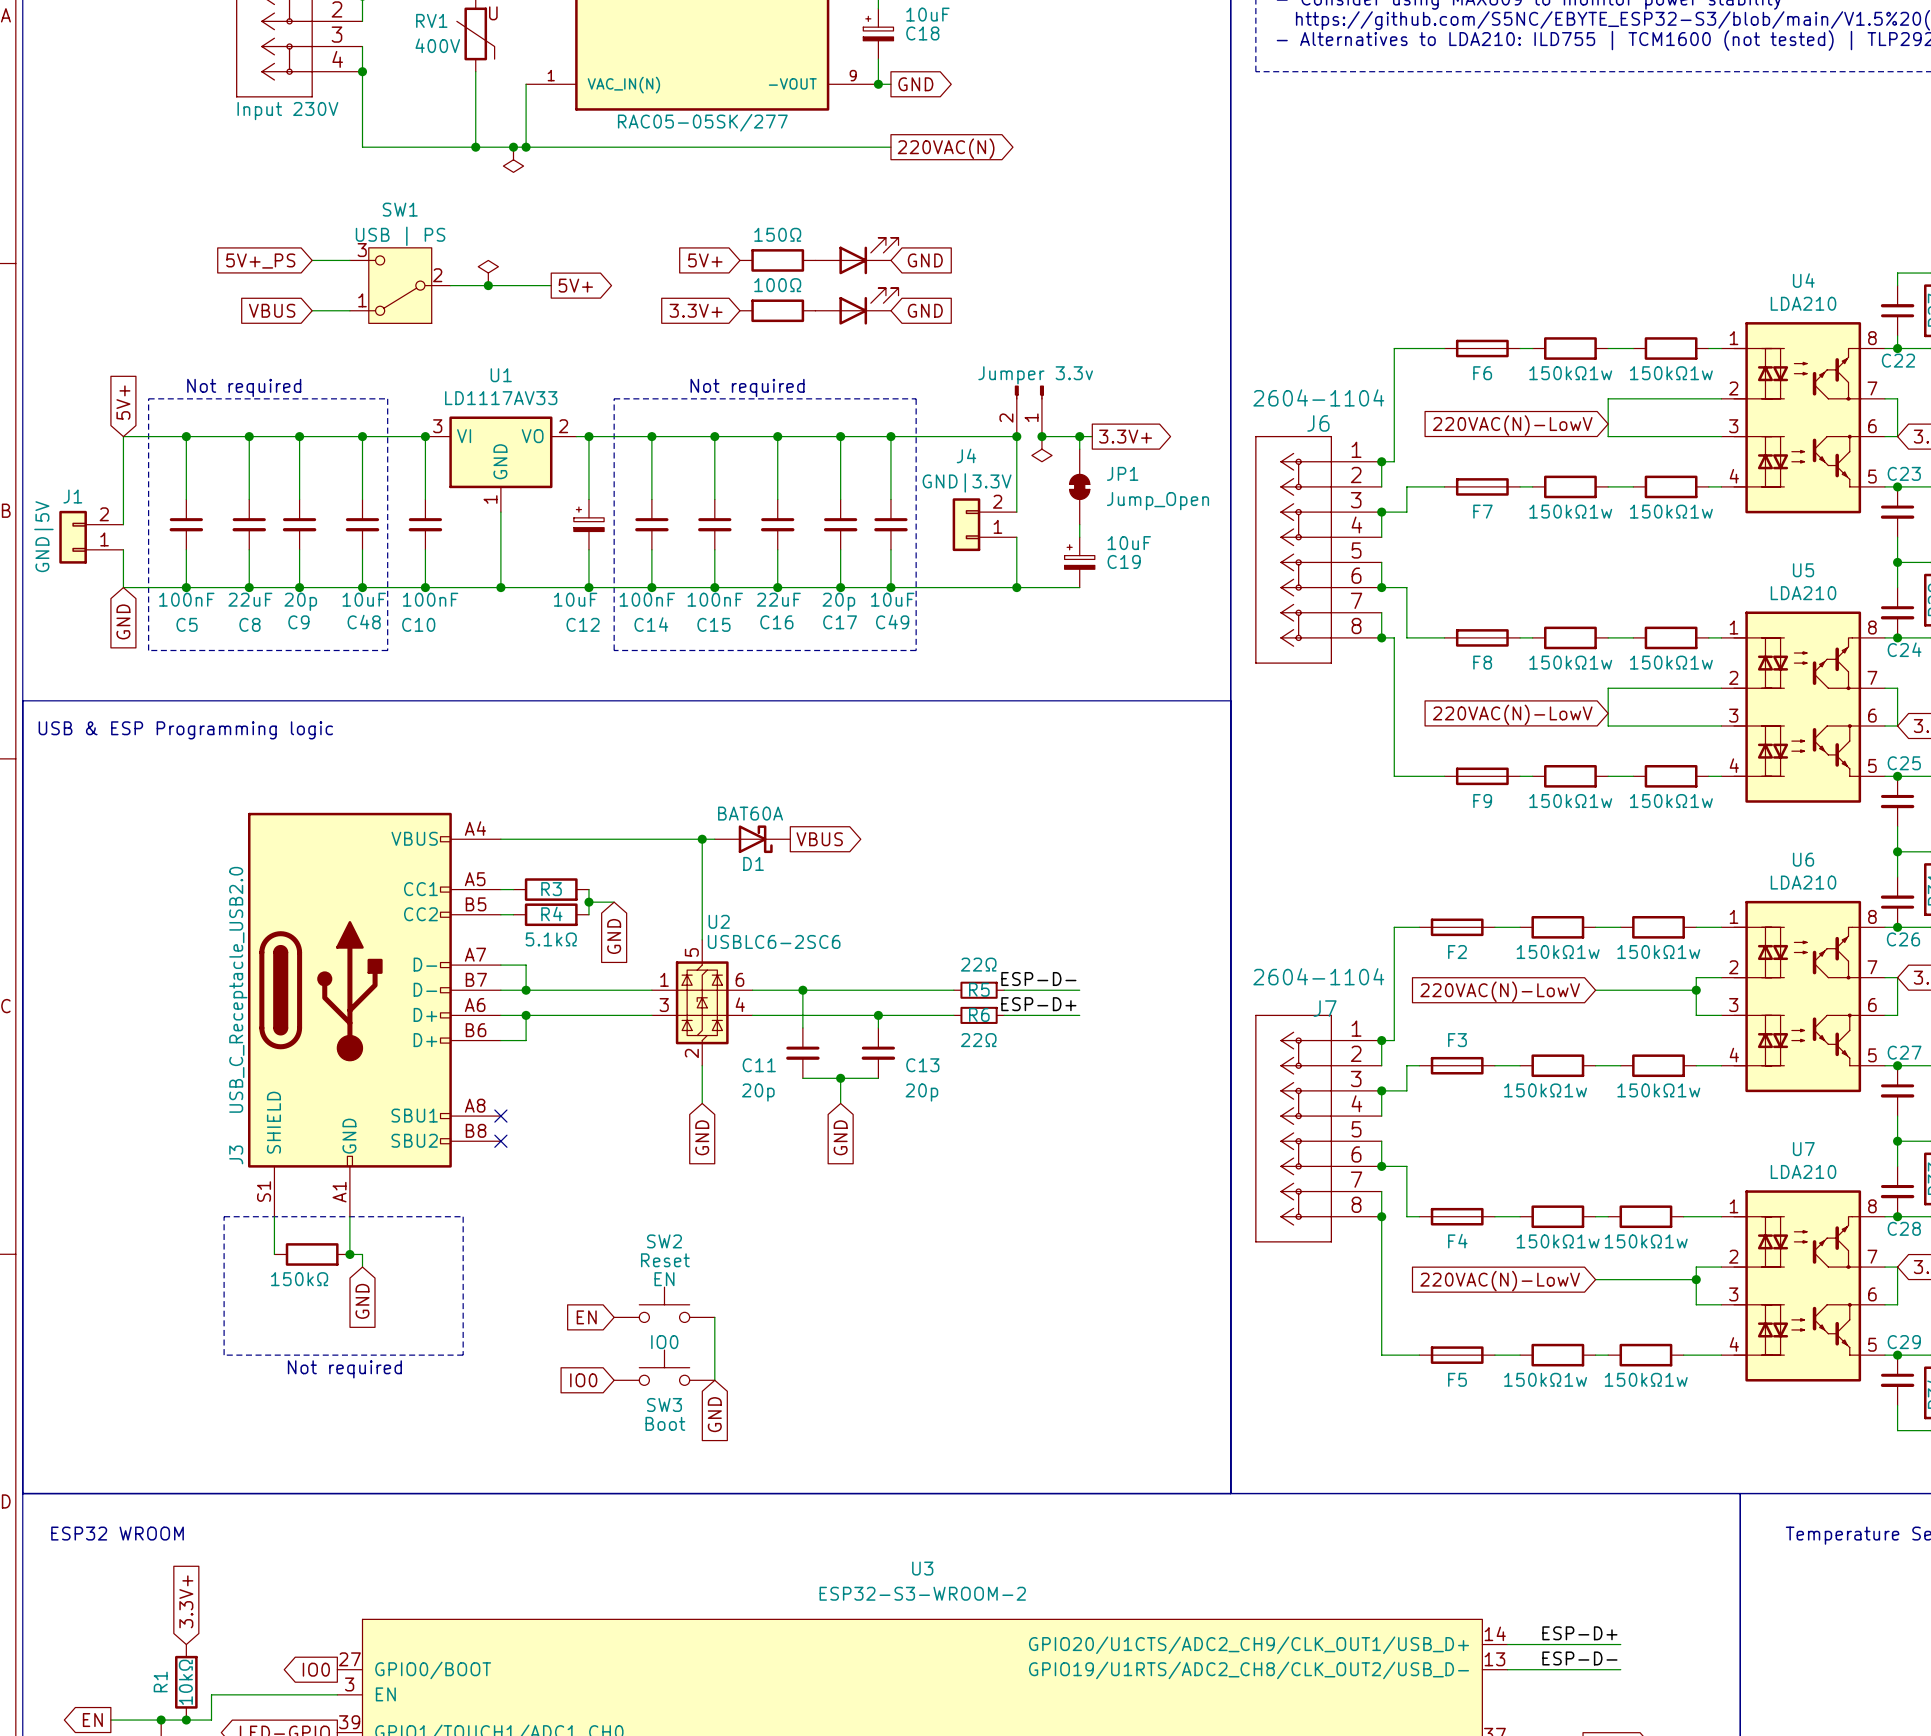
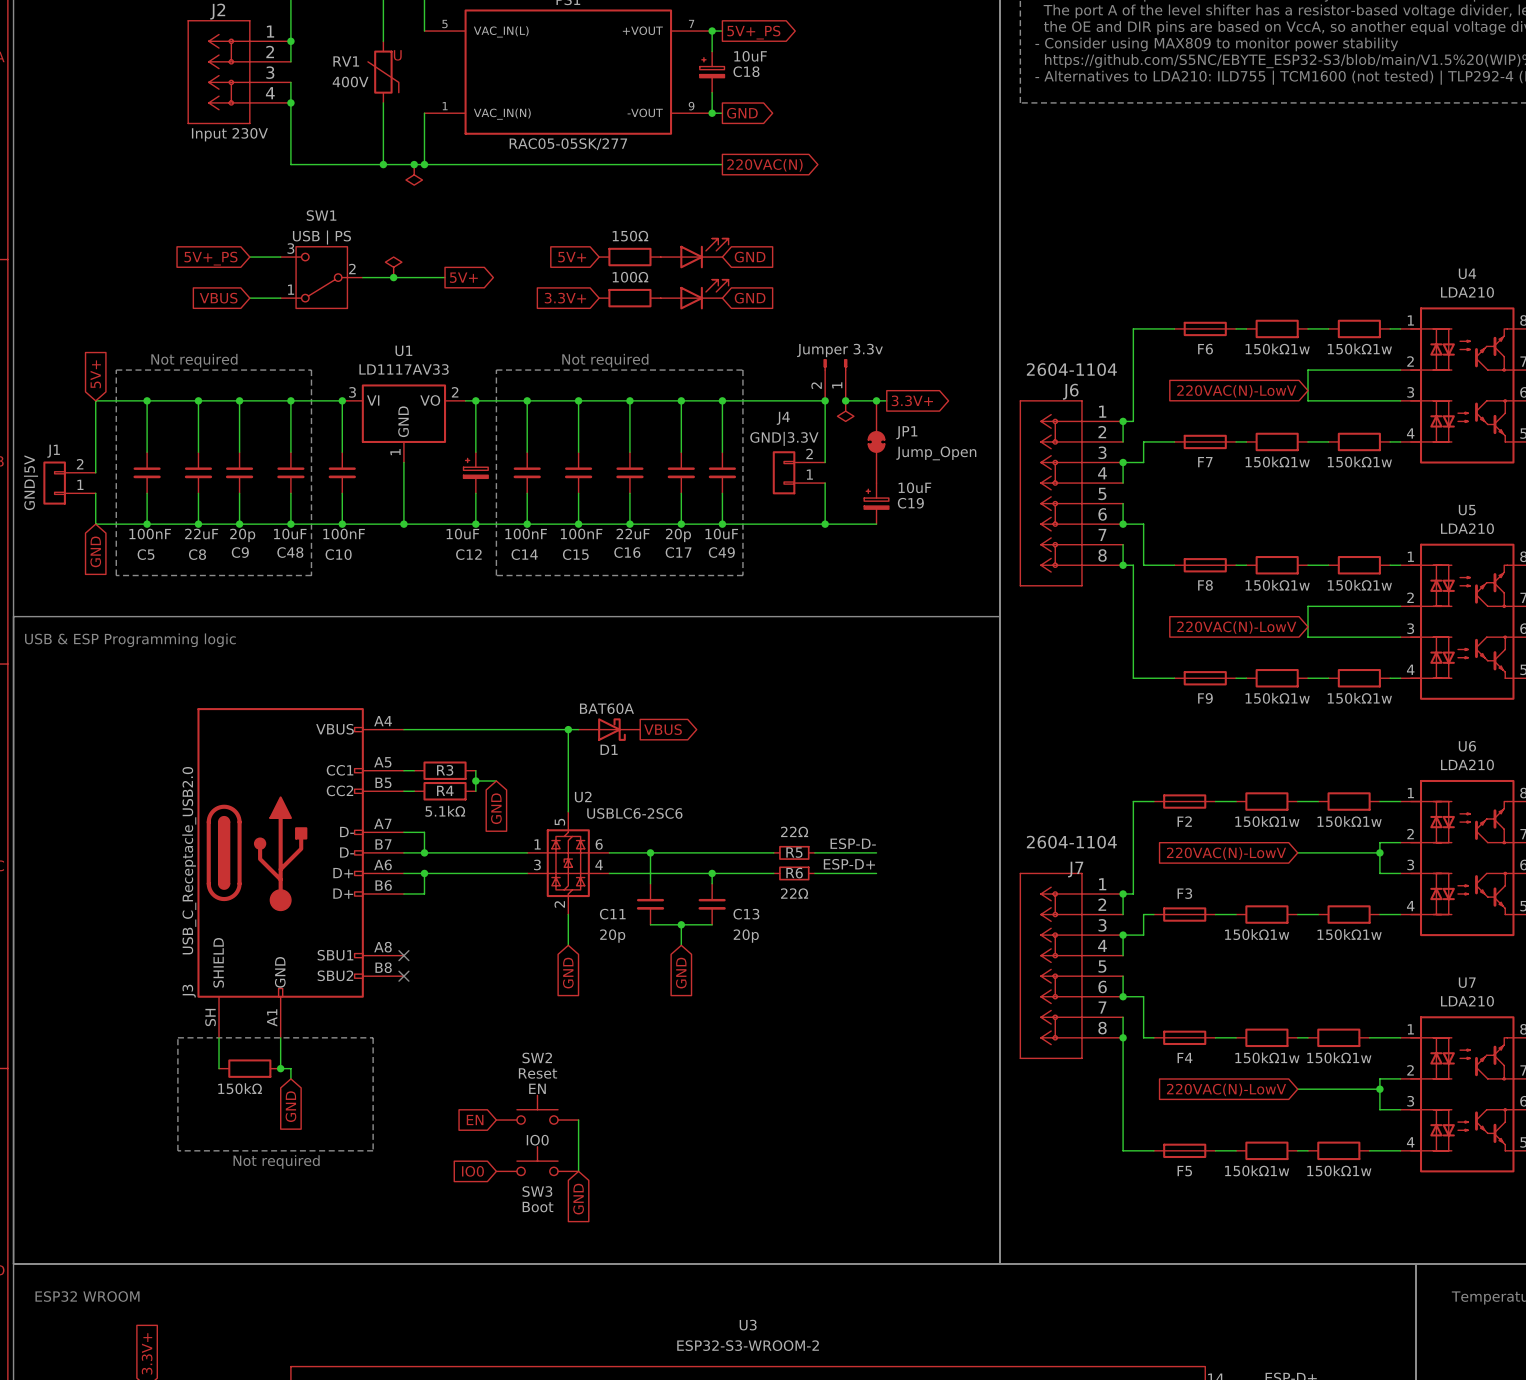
JP1 symbol: [1069, 449, 1090, 525] -> [867, 400, 886, 484]
J3 pin number: S1 (264, 1191) -> SH (210, 1017)

